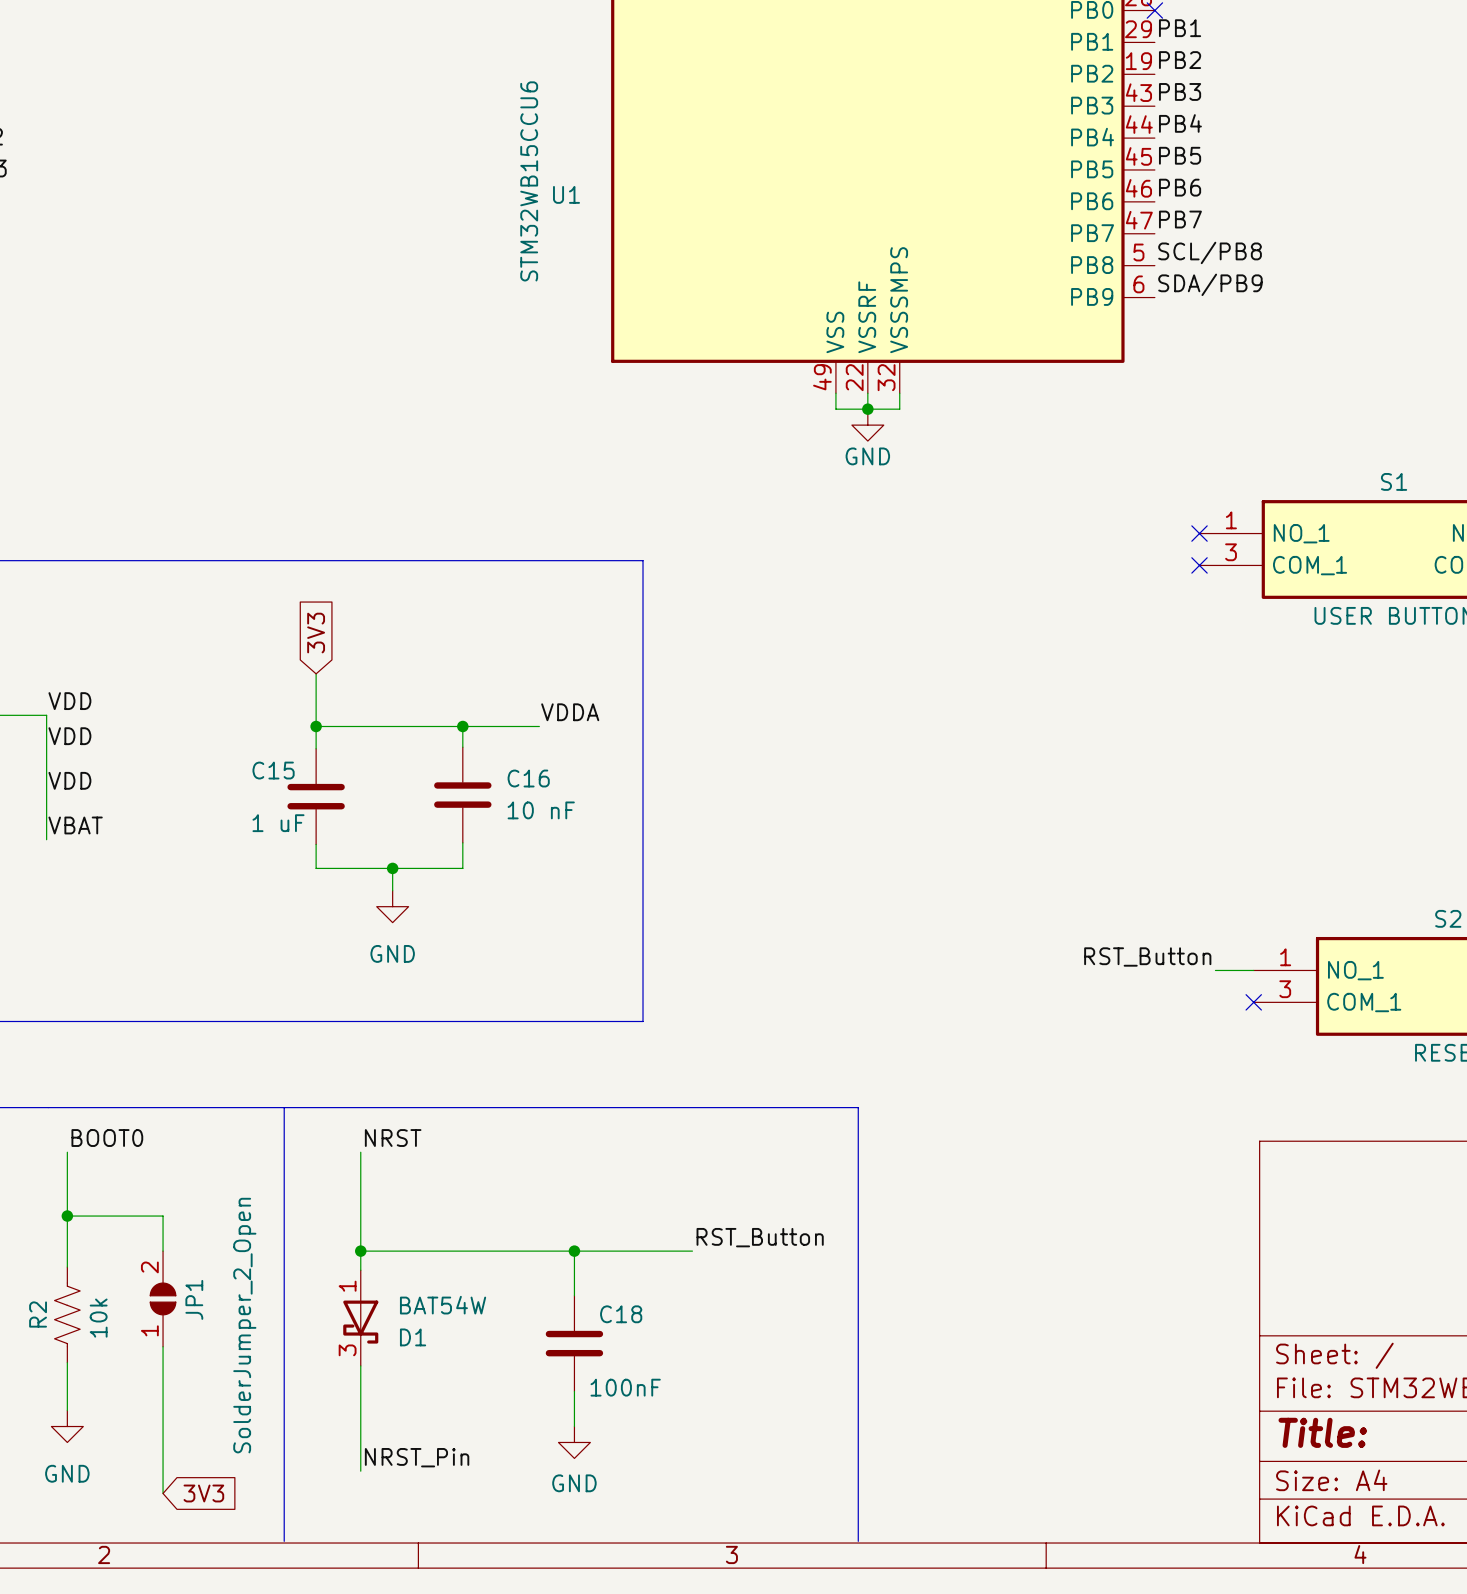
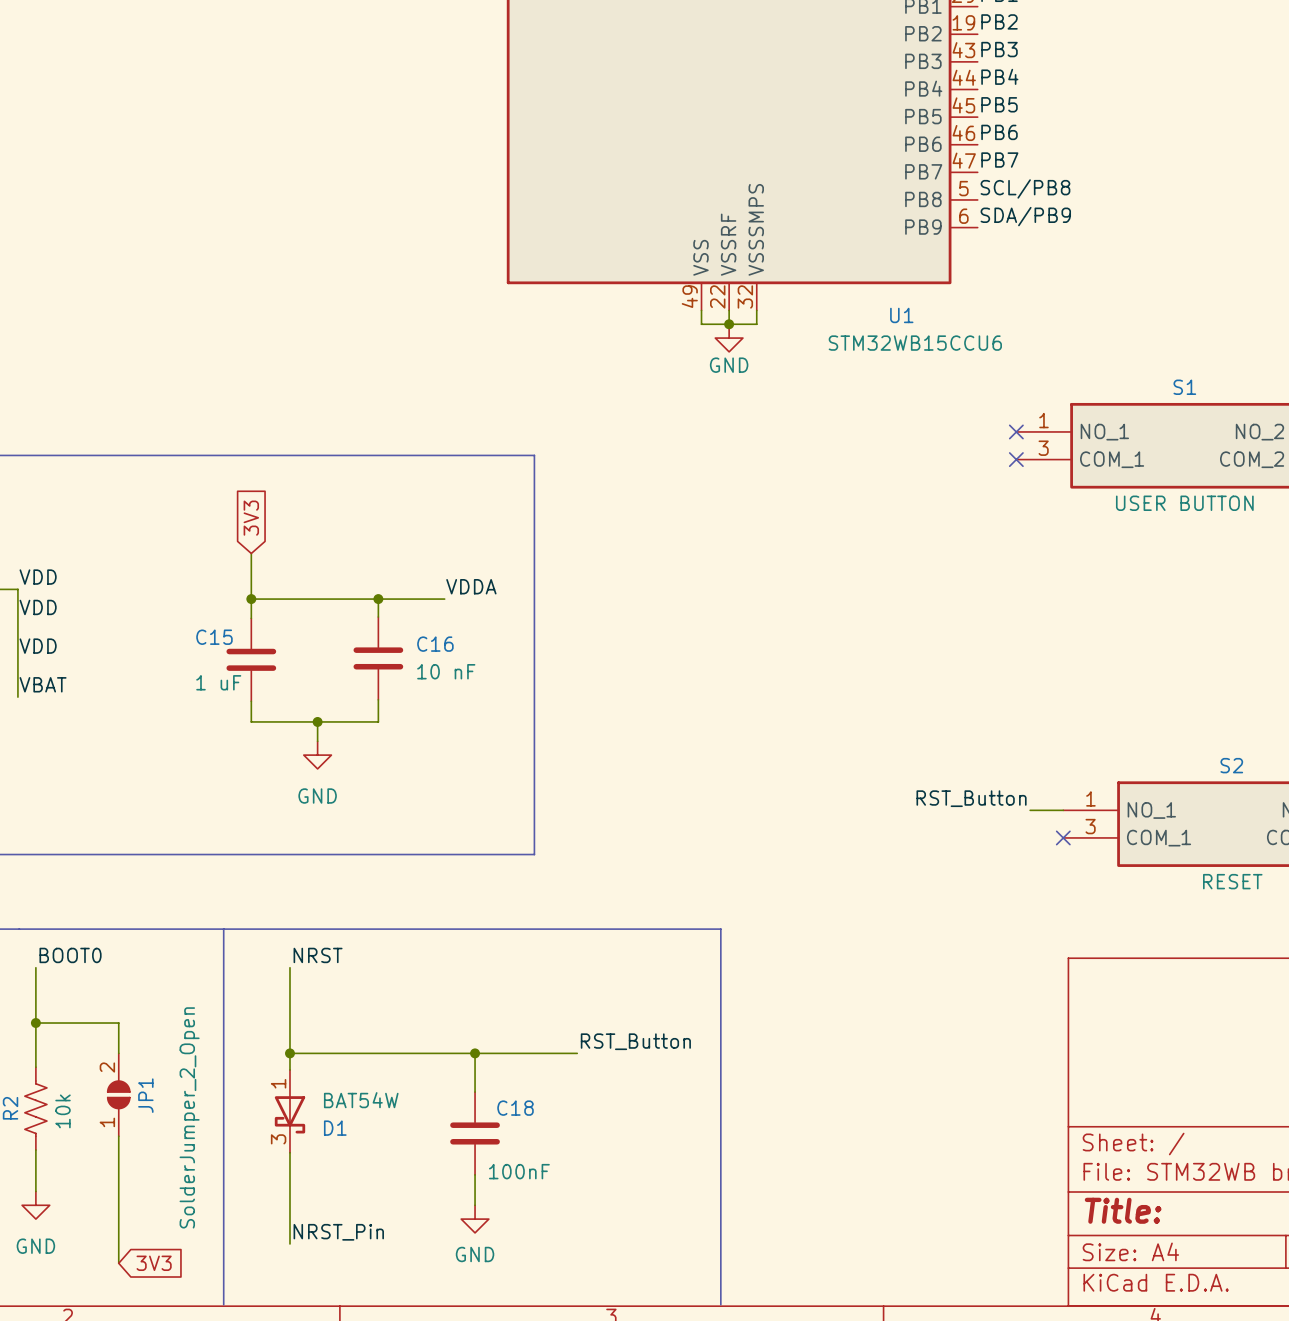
U1 value rotation: 0° (529, 181) -> 90° clockwise (915, 343)
U1 value position: STM32WB15CCU6 (529, 181) -> STM32WB15CCU6 (915, 343)
U1 name position: U1 (566, 194) -> U1 (901, 315)

